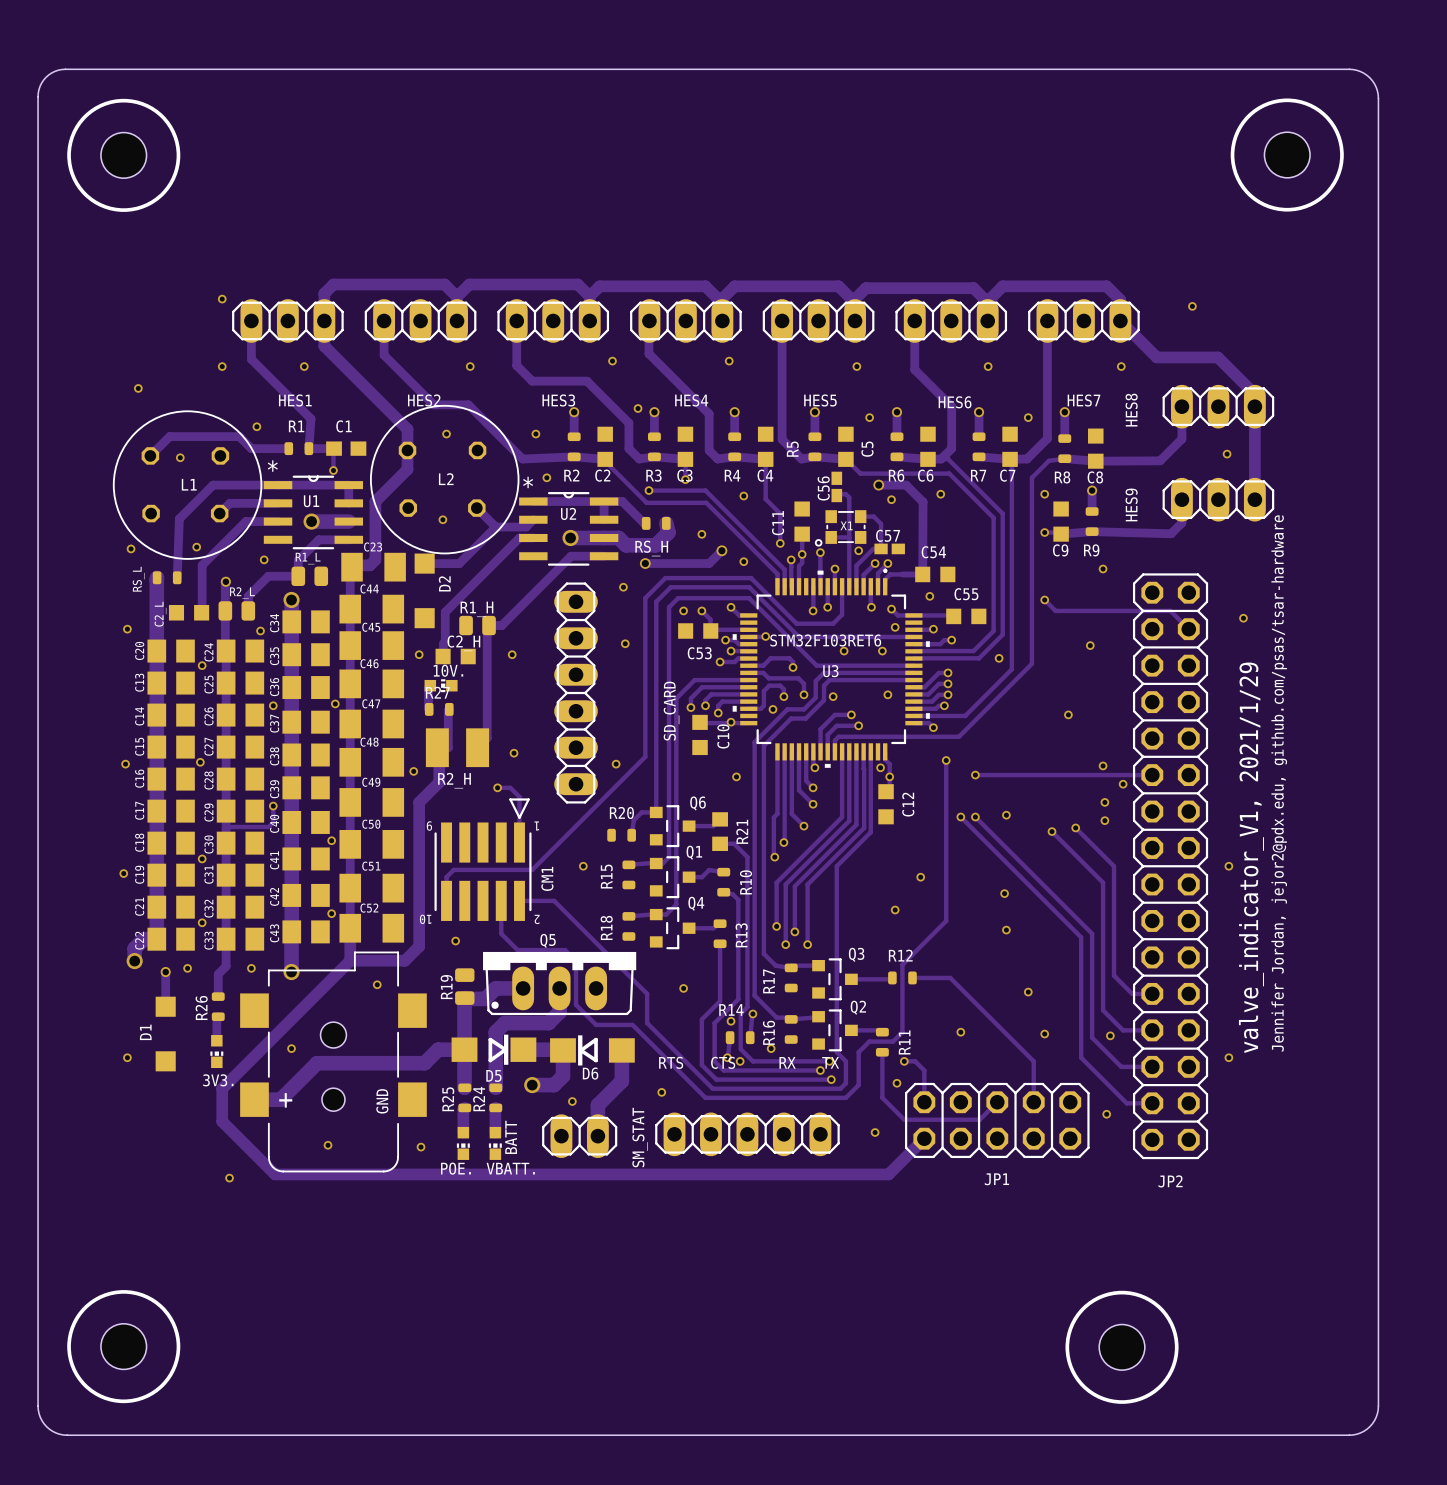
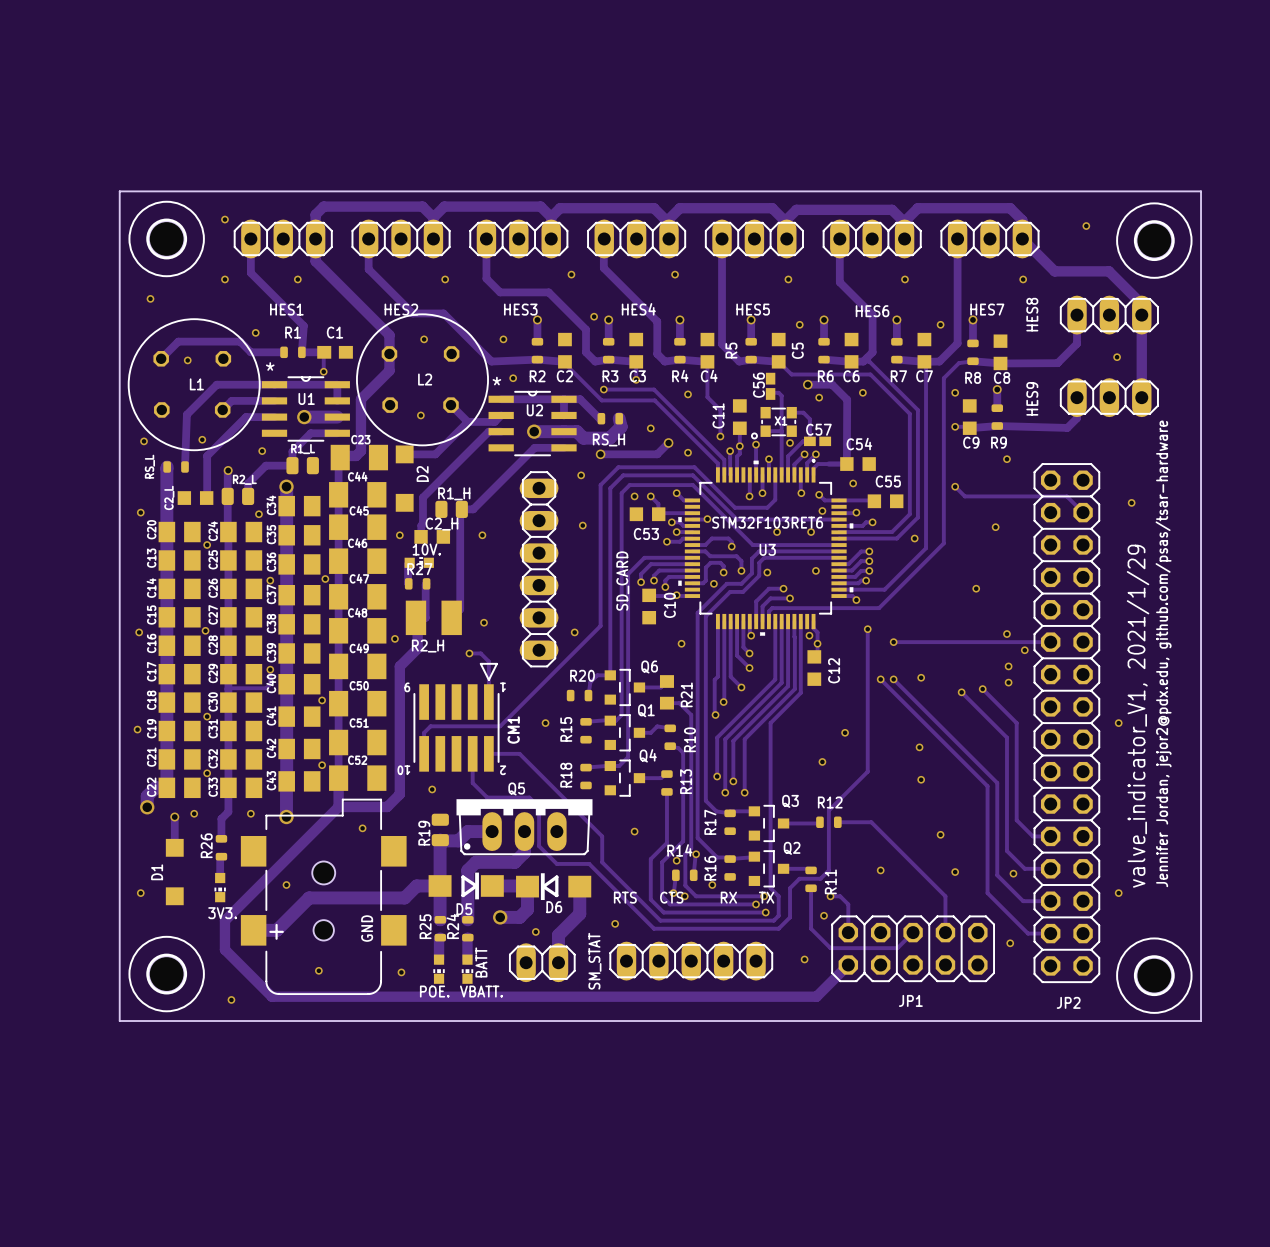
board edge: (65, 69) (1349, 69) (1360, 71) (1369, 77) (1376, 87) (1378, 98) (1378, 1406) (1376, 1417) (1369, 1426) (1360, 1433) (1349, 1435) (67, 1435) (56, 1433) (46, 1426) (40, 1417) (38, 1406) (38, 96) (40, 86) (46, 77) (54, 71) (65, 69) -> (119, 191) (119, 1021) (1201, 1021) (1201, 191) (119, 191)
part: (123, 155) -> none
part: (1287, 155) -> none
part: none -> (166, 238)
part: none -> (1154, 240)
part: none -> (166, 974)
part: none -> (1154, 975)
part: (123, 1346) -> none
part: (1122, 1347) -> none

